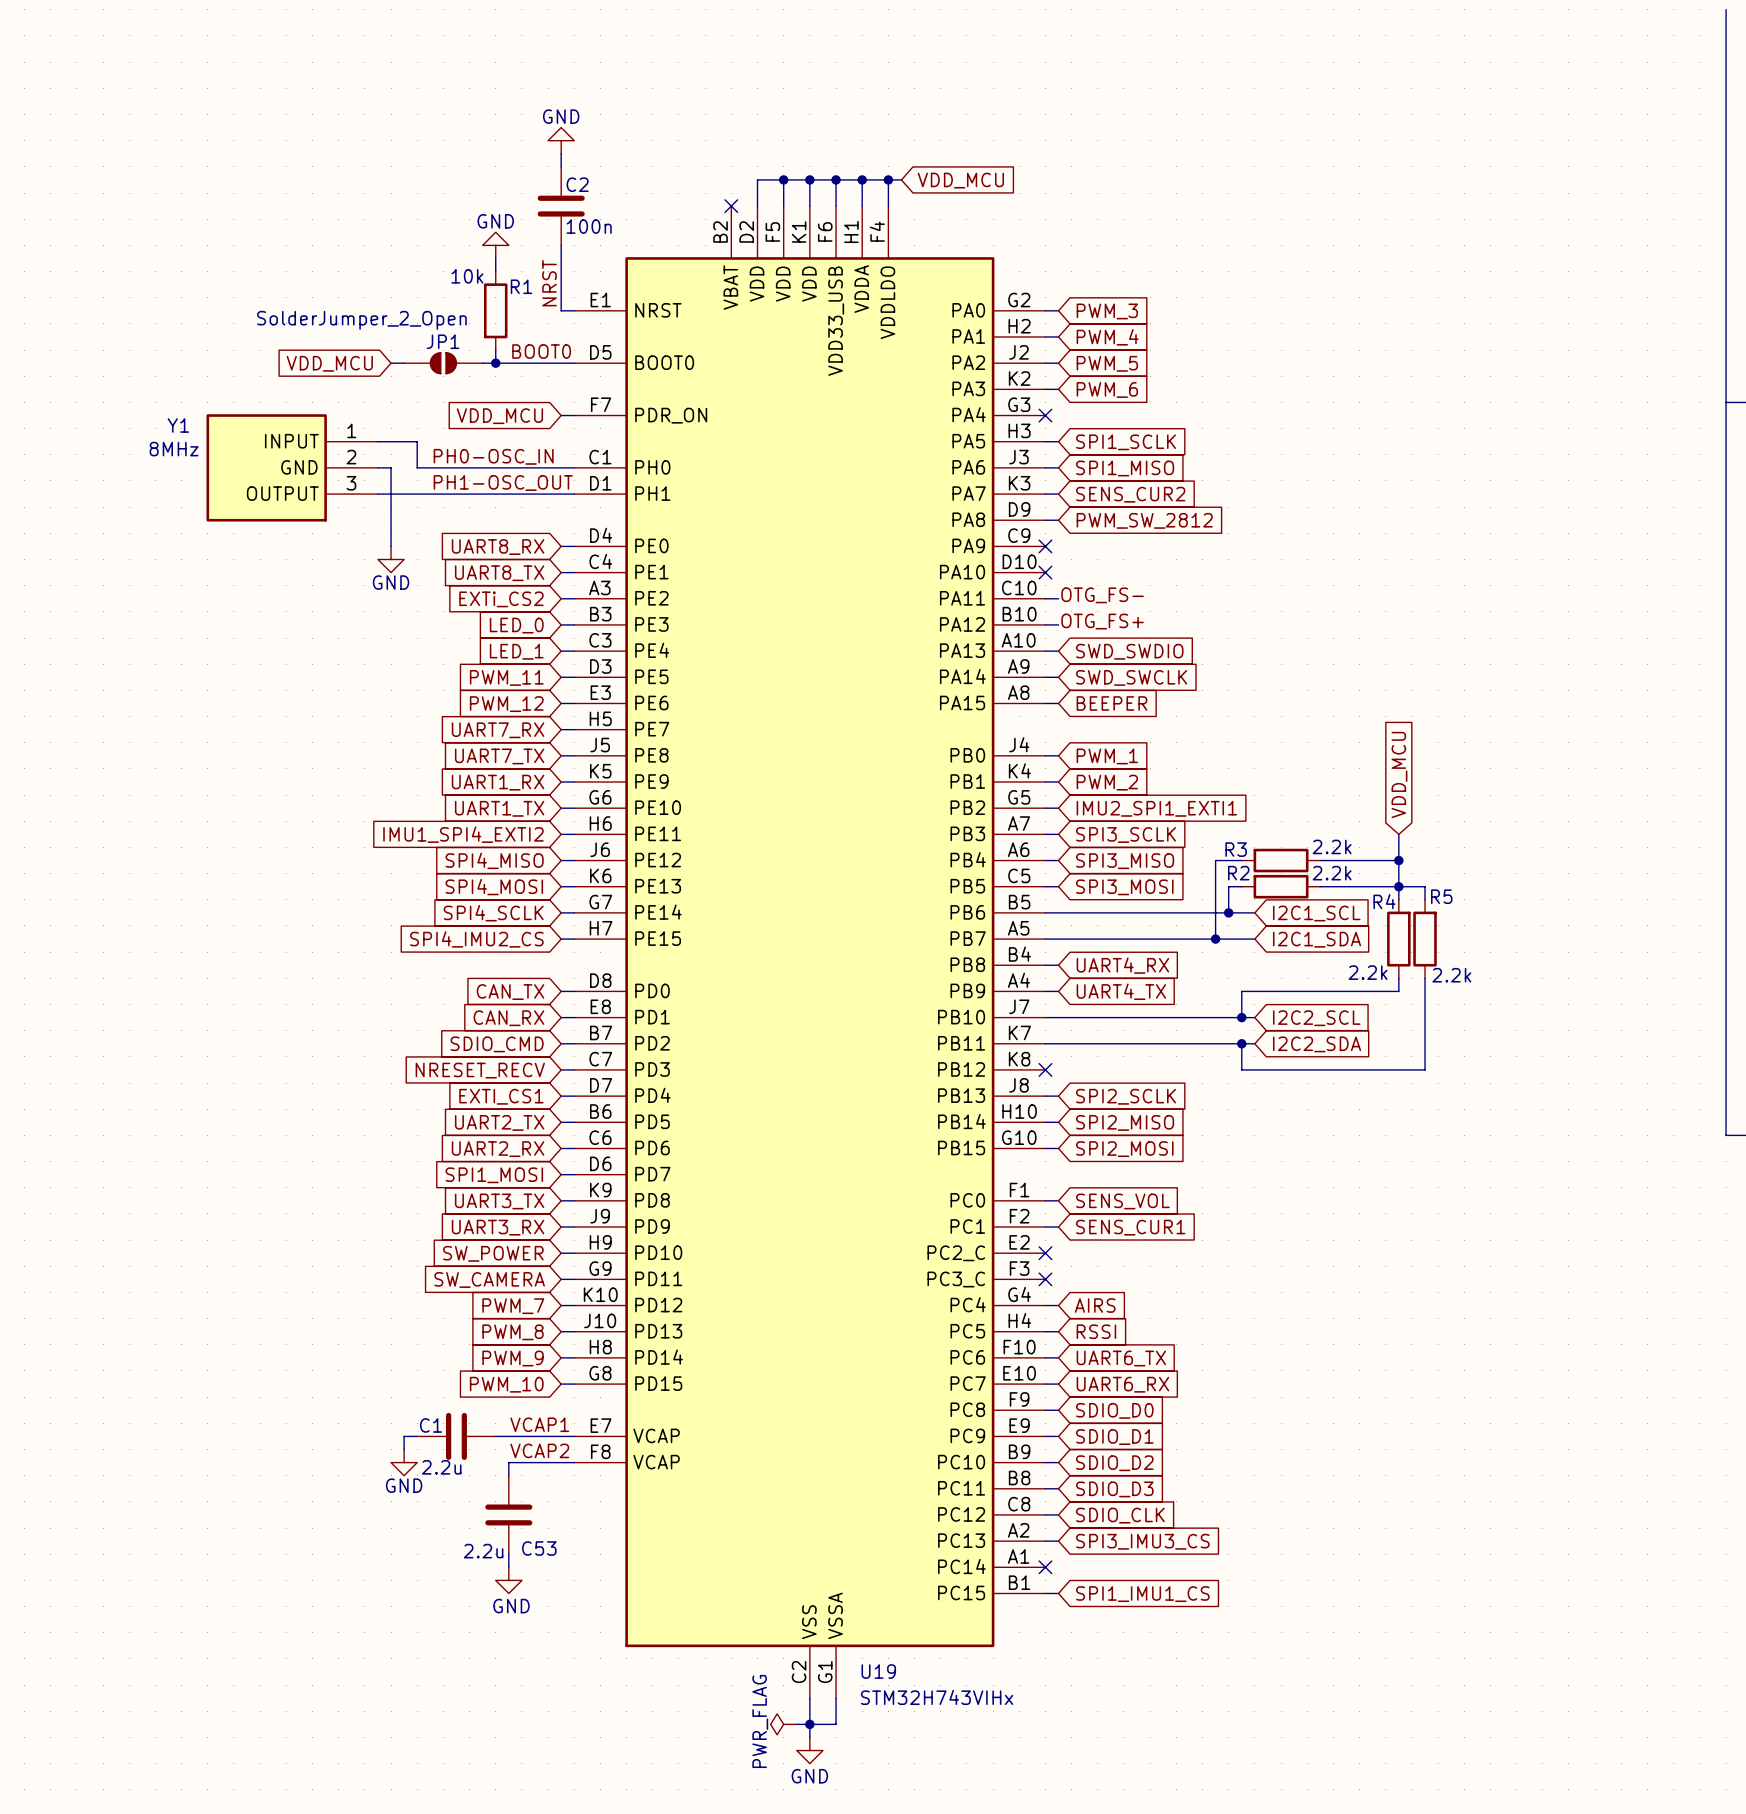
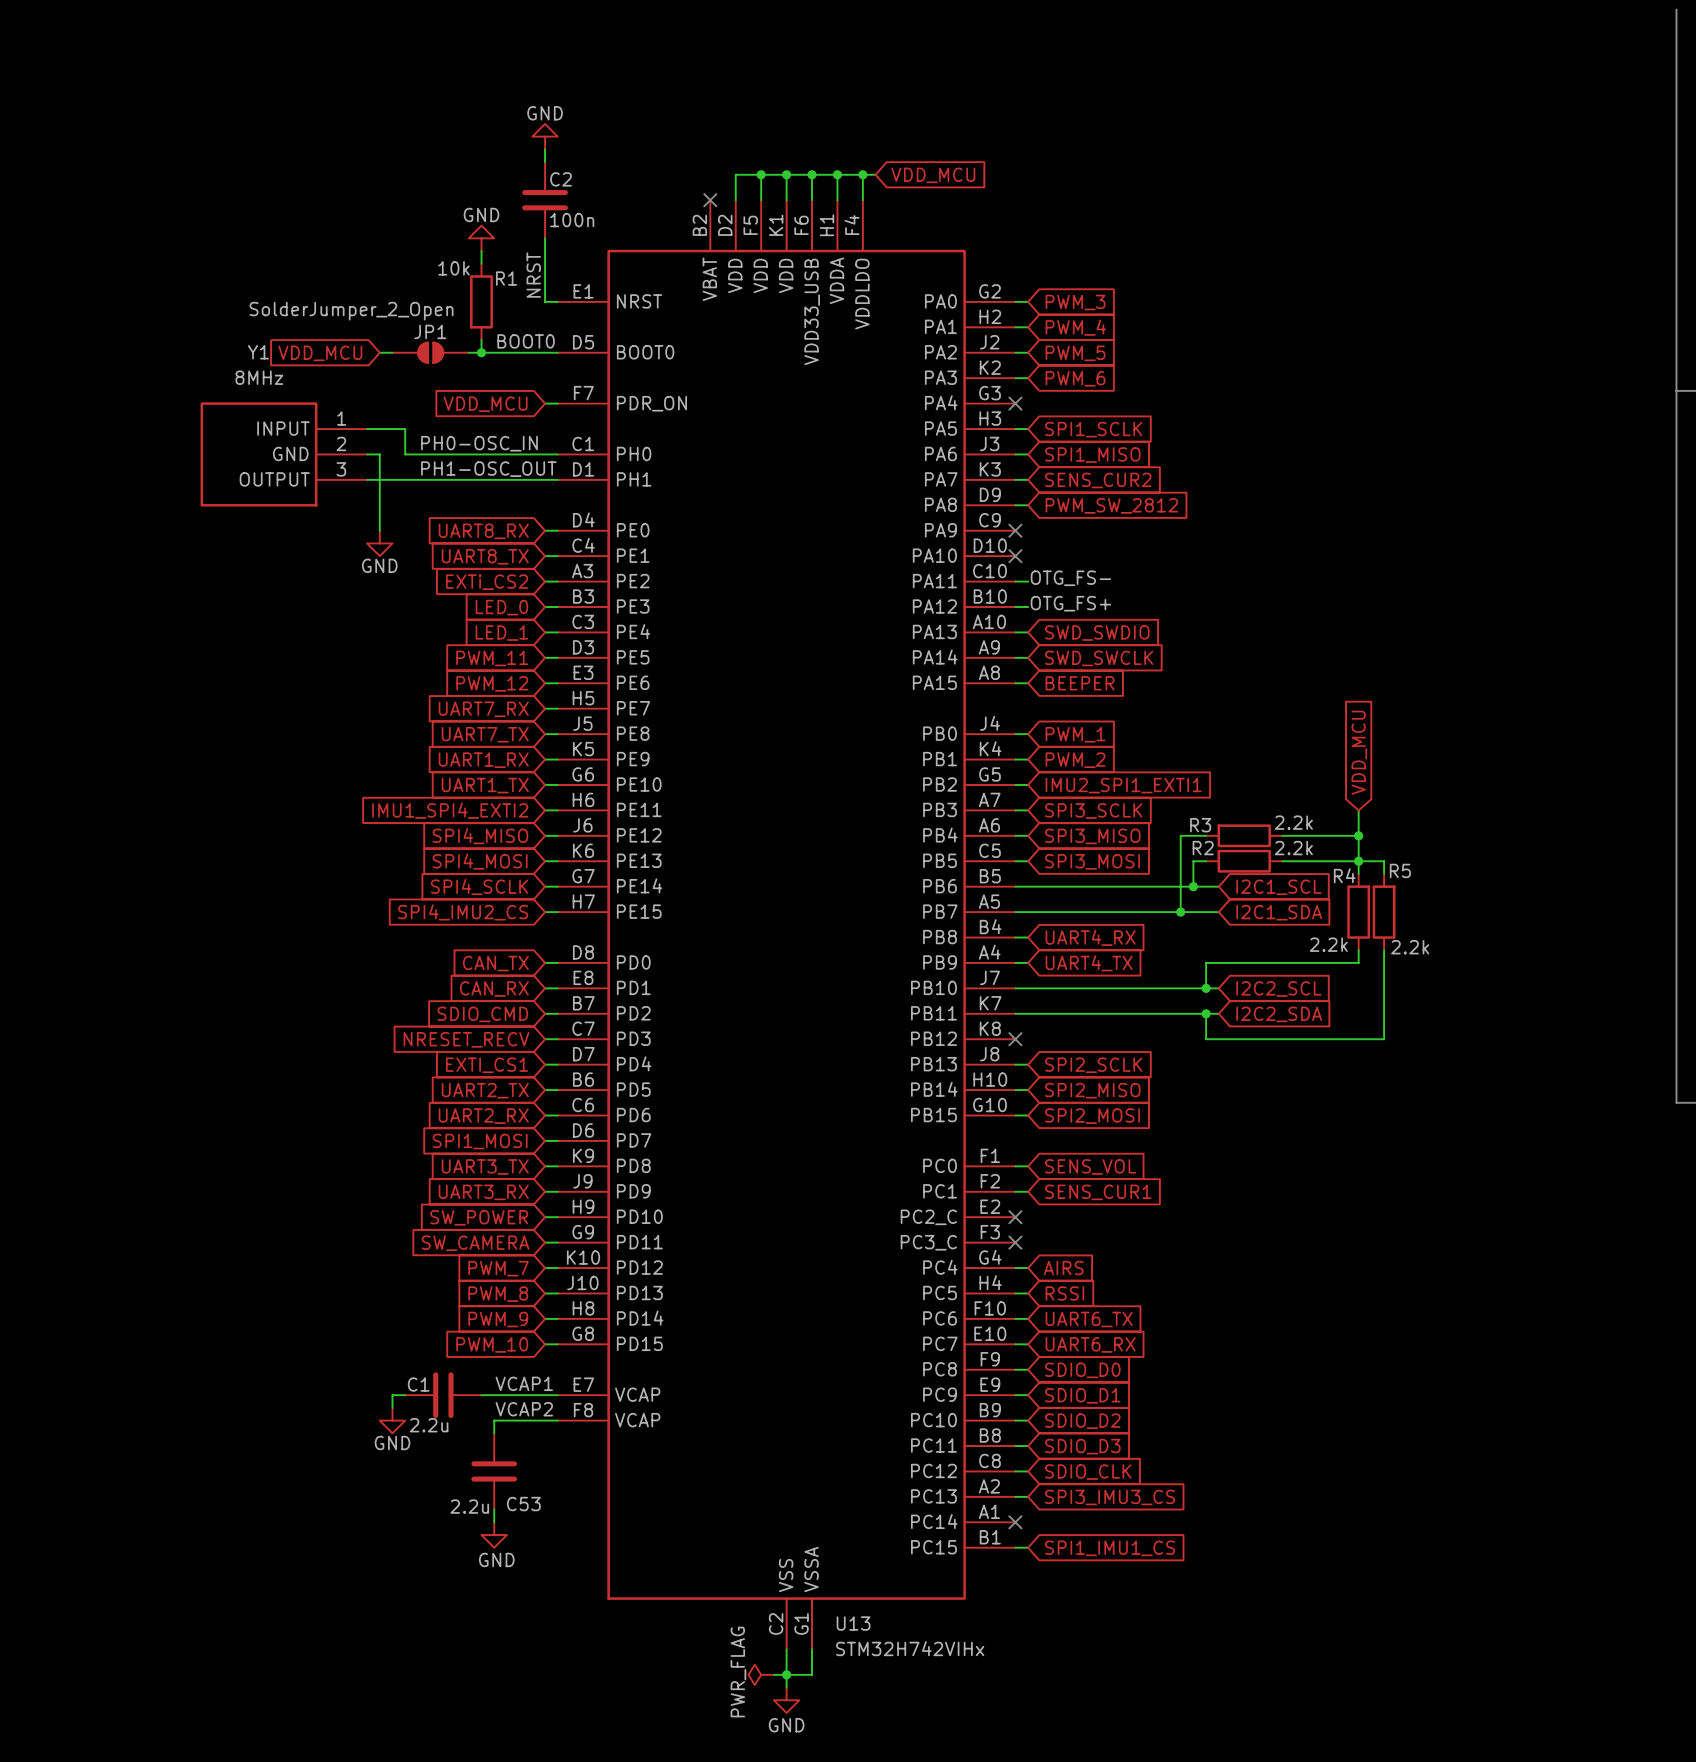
Y1 name position: Y1 (178, 425) -> Y1 (258, 352)
Y1 value position: 8MHz (174, 449) -> 8MHz (259, 377)
U19 name: U19 (878, 1671) -> U13 (853, 1623)
U19 value: STM32H743VIHx (937, 1697) -> STM32H742VIHx (910, 1648)

